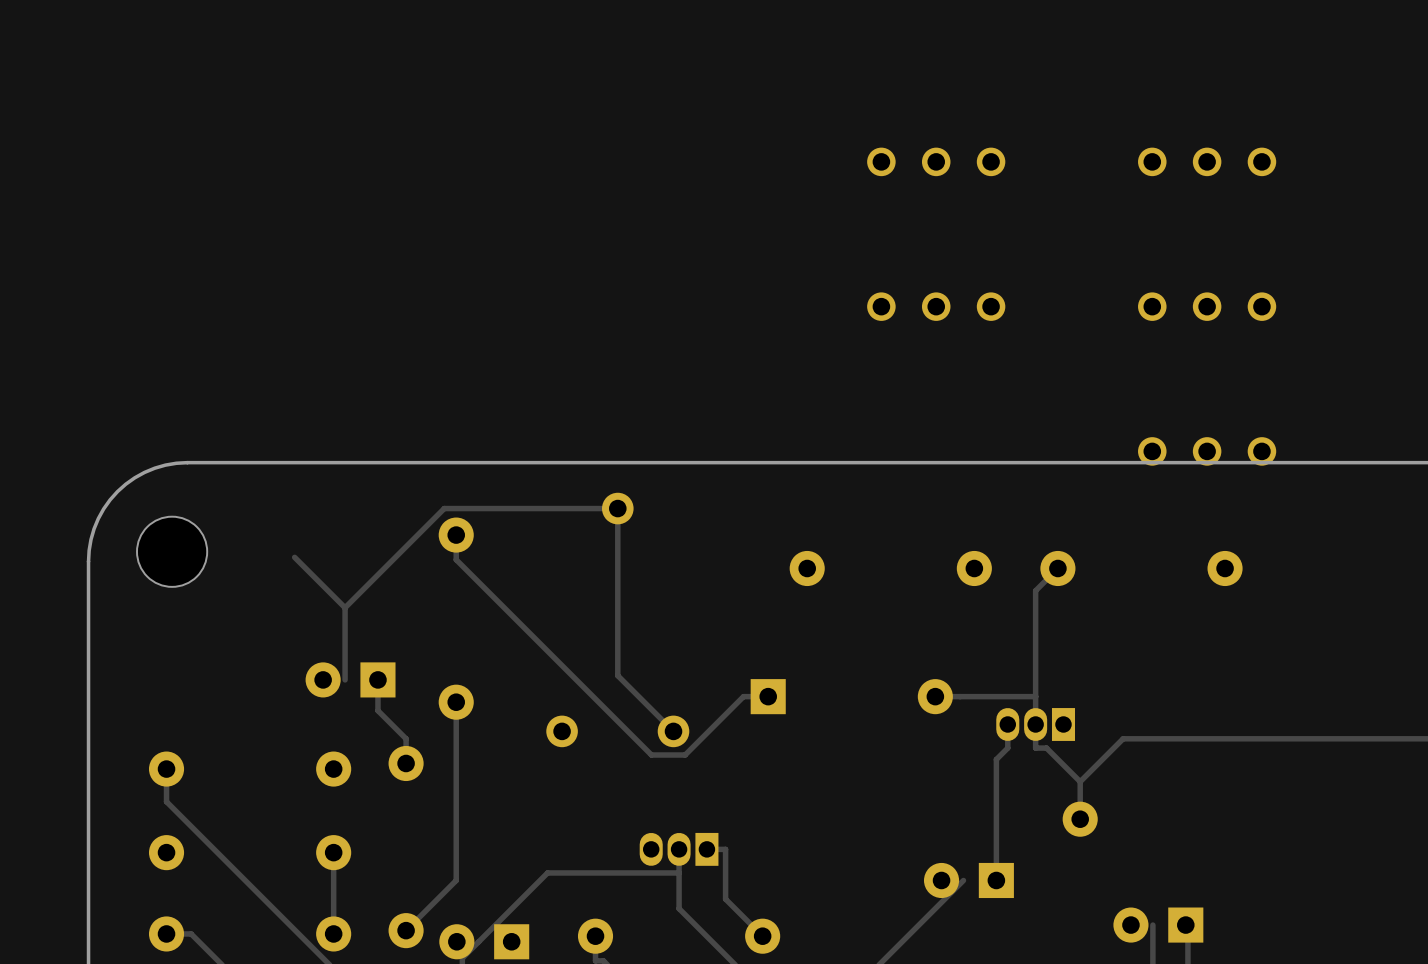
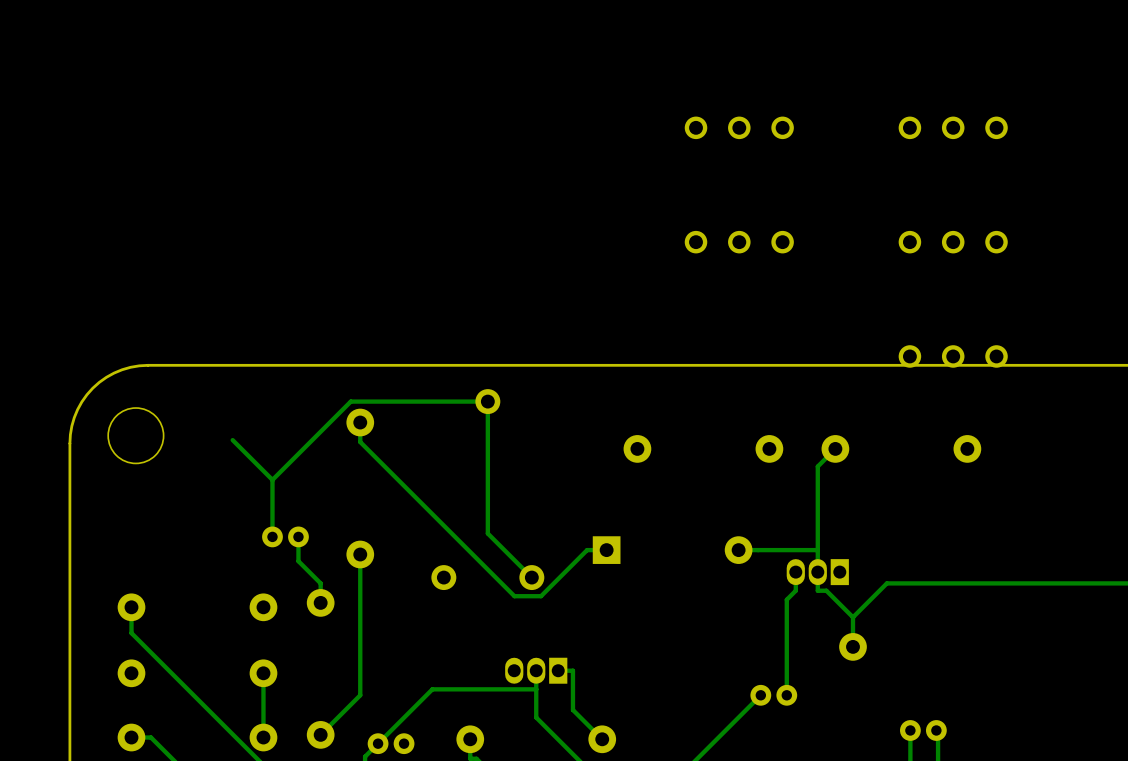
part footprint: [305, 662, 396, 698] -> [262, 526, 309, 548]
part footprint: [923, 862, 1014, 899] -> [750, 684, 798, 706]
part footprint: [1113, 907, 1204, 943] -> [900, 720, 947, 741]
part footprint: [439, 924, 530, 960] -> [367, 733, 415, 755]

